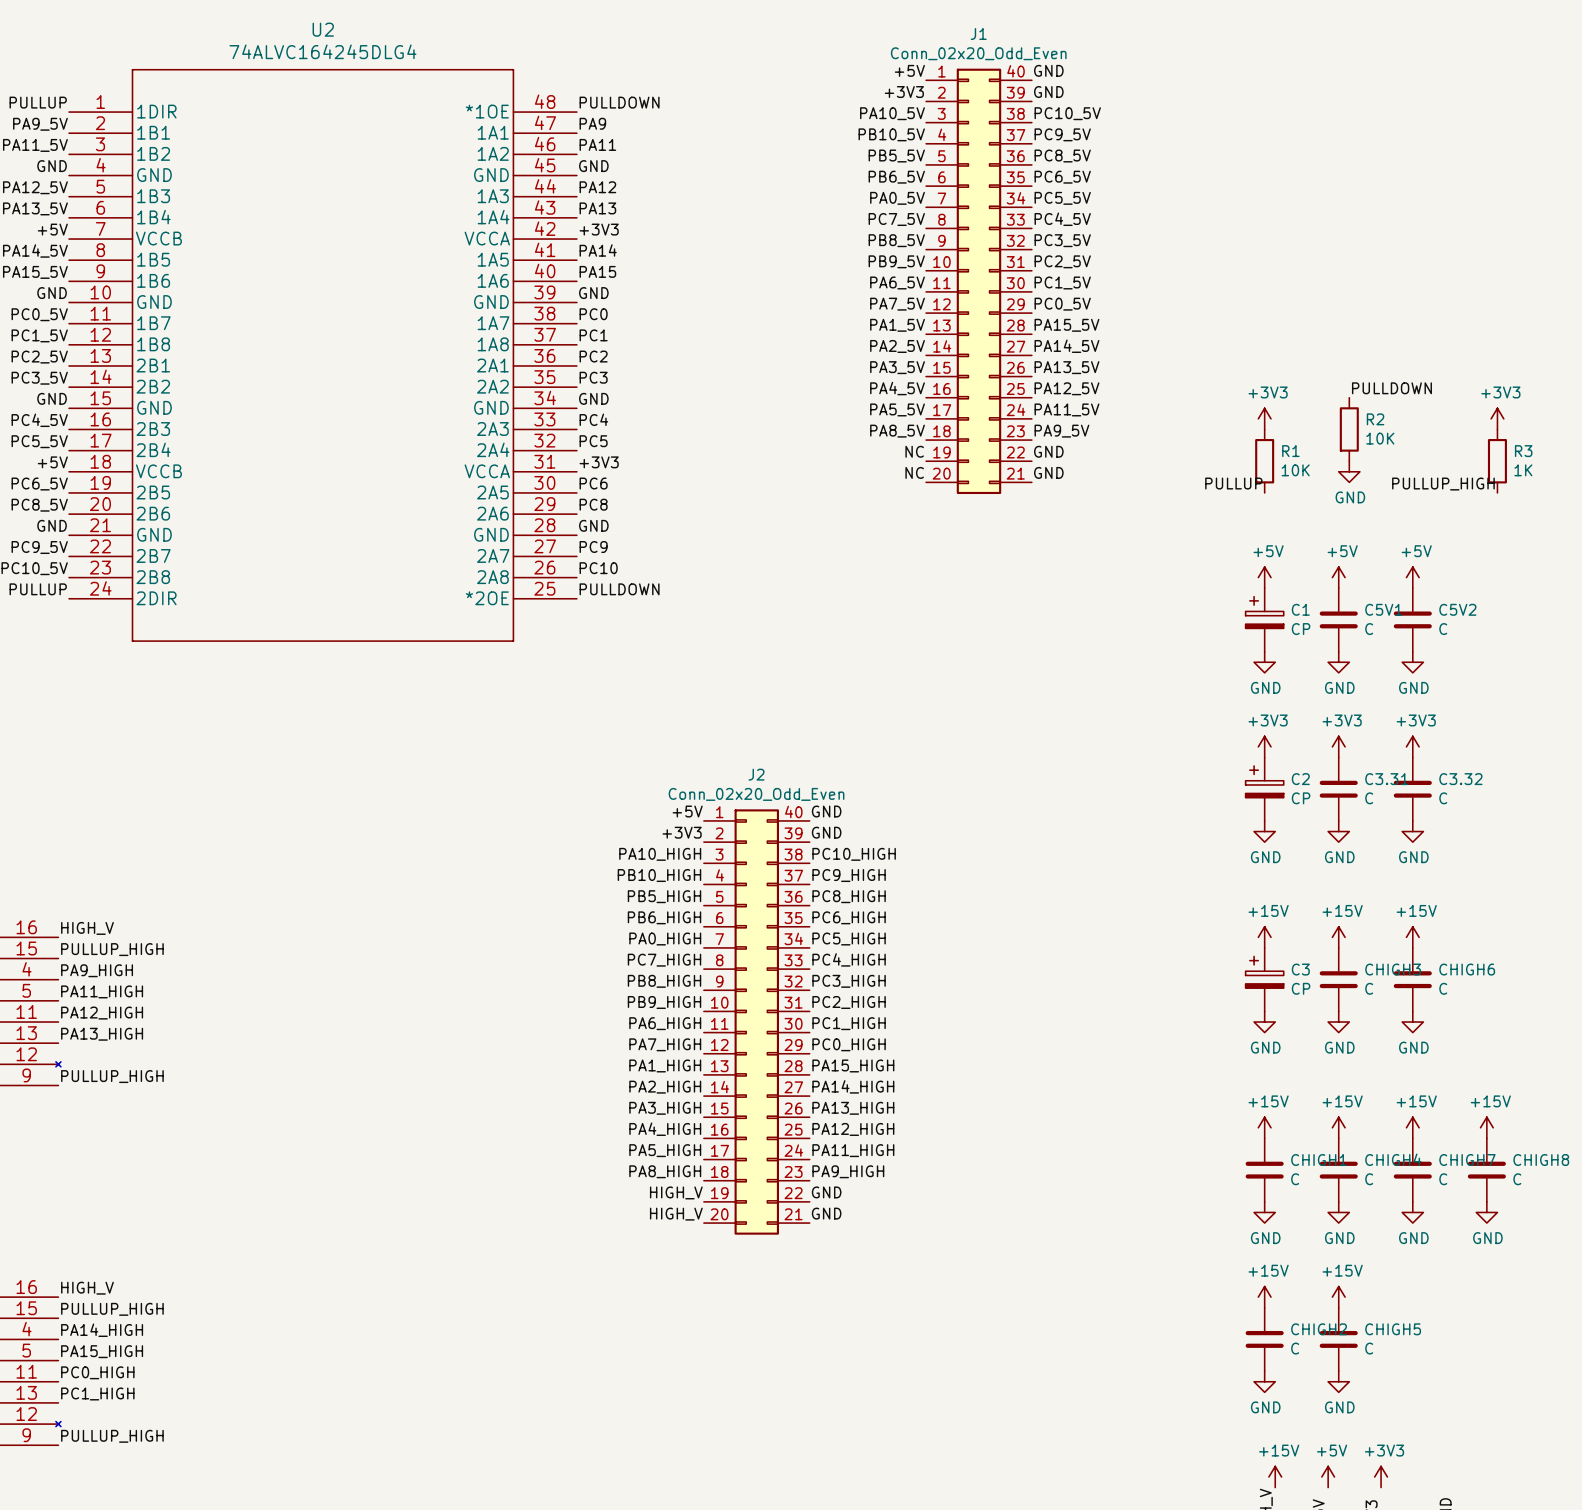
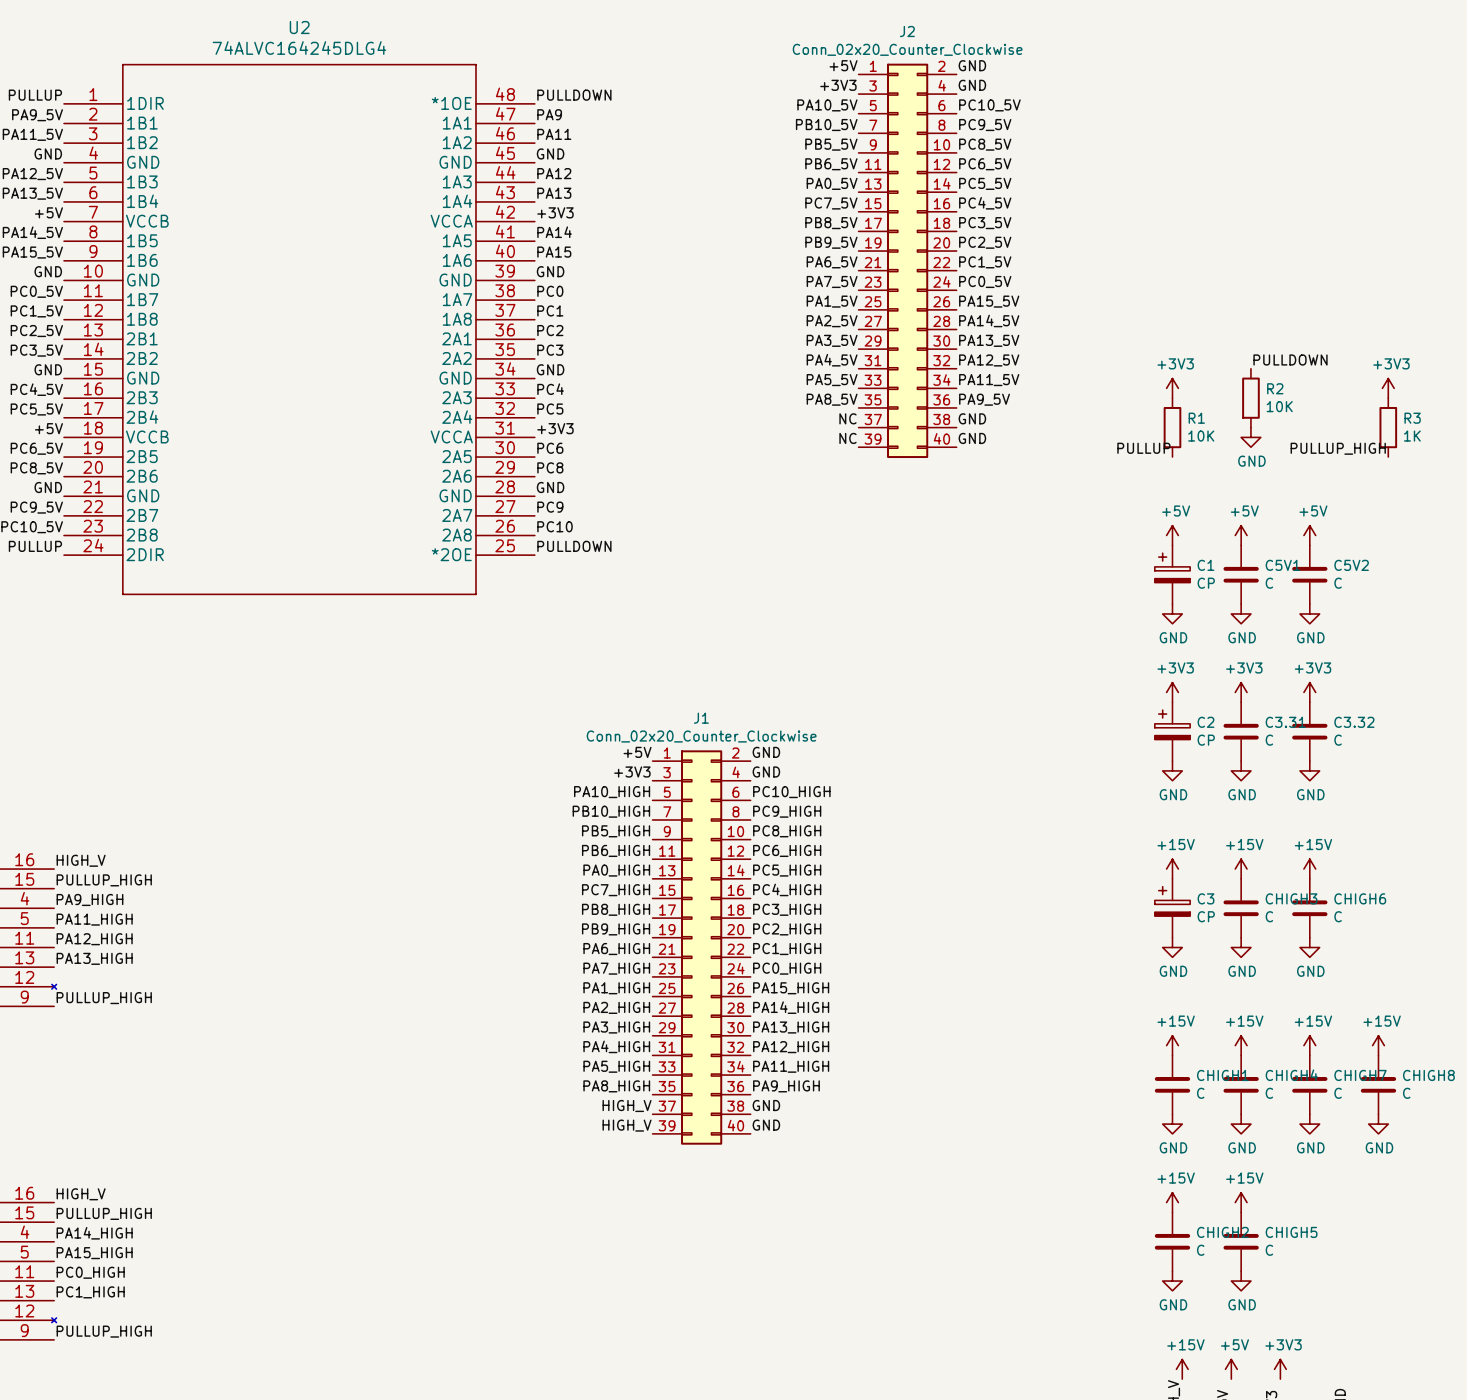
J1 value: Conn_02x20_Odd_Even (978, 53) -> Conn_02x20_Counter_Clockwise (701, 736)
J1 symbol: [926, 68, 1032, 495] -> [652, 750, 751, 1145]
J2 value: Conn_02x20_Odd_Even (756, 794) -> Conn_02x20_Counter_Clockwise (907, 49)
J2 symbol: [703, 809, 810, 1235] -> [858, 63, 957, 459]

